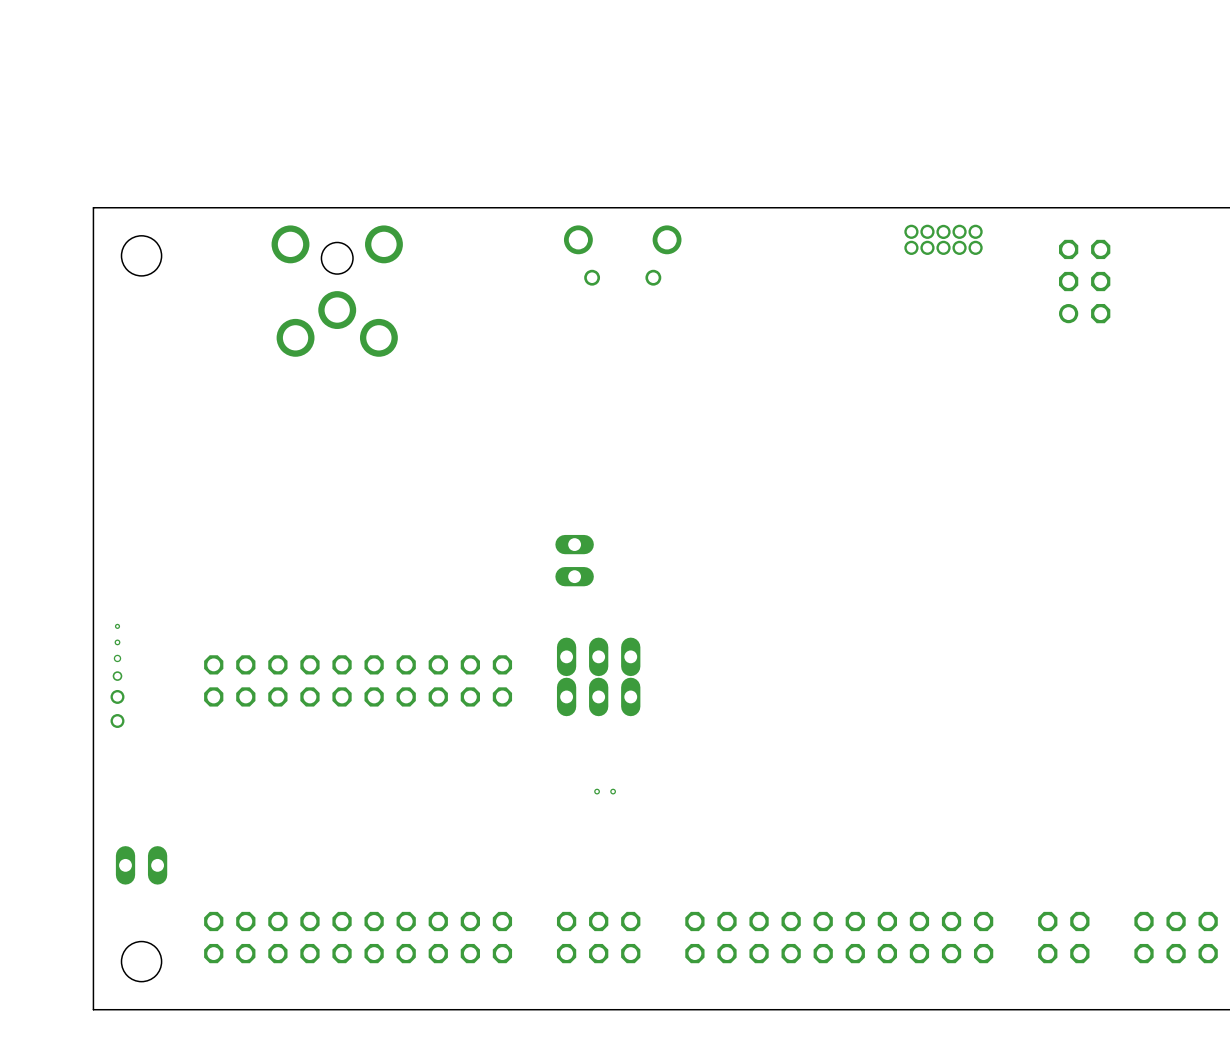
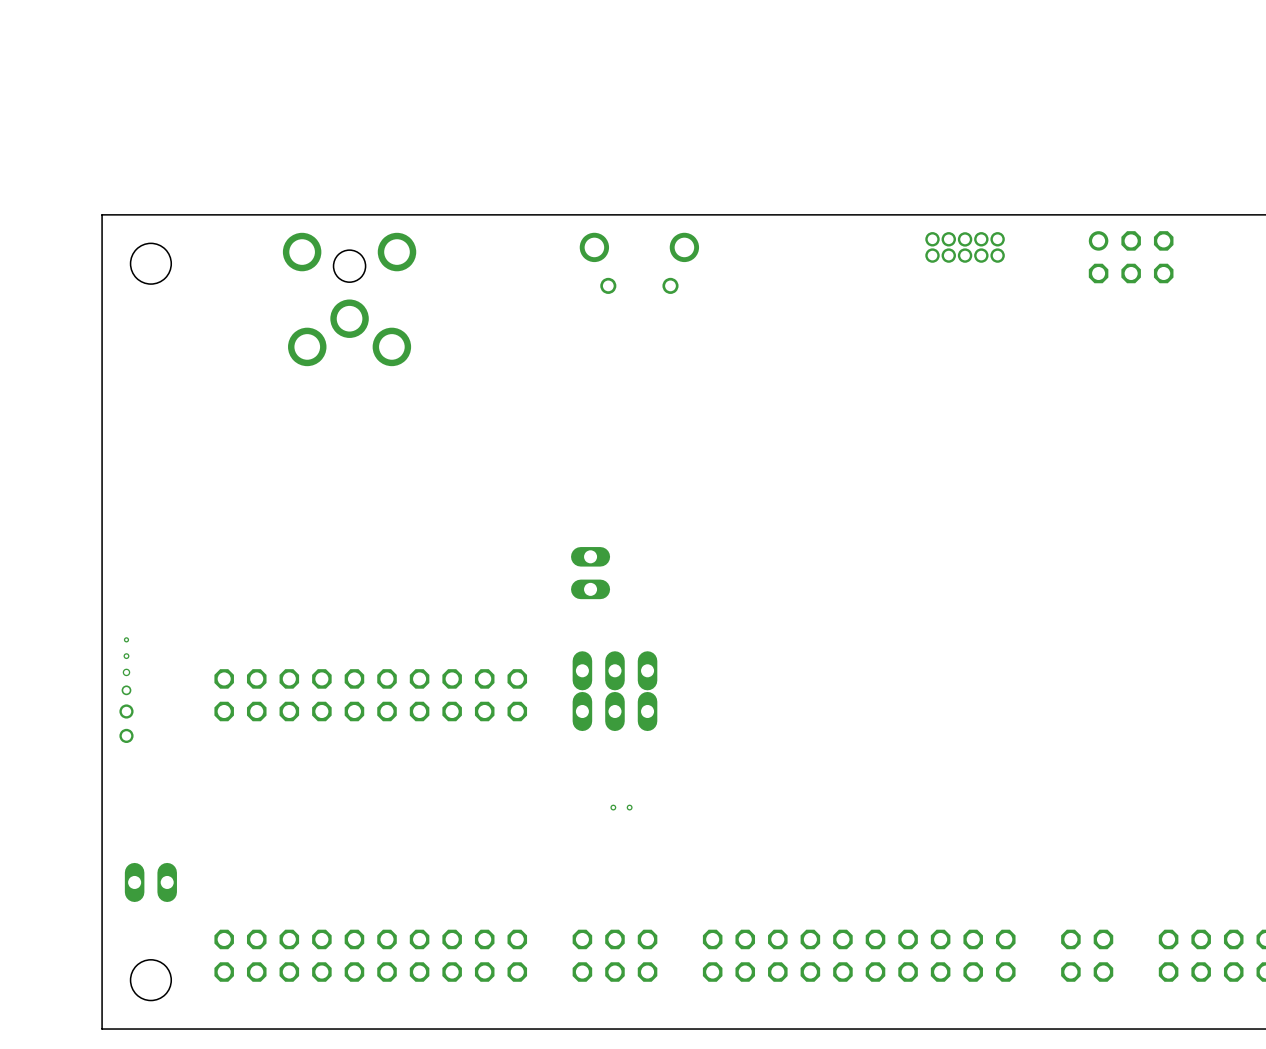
part rotation: 0° (1084, 281) -> 90° clockwise (1131, 257)

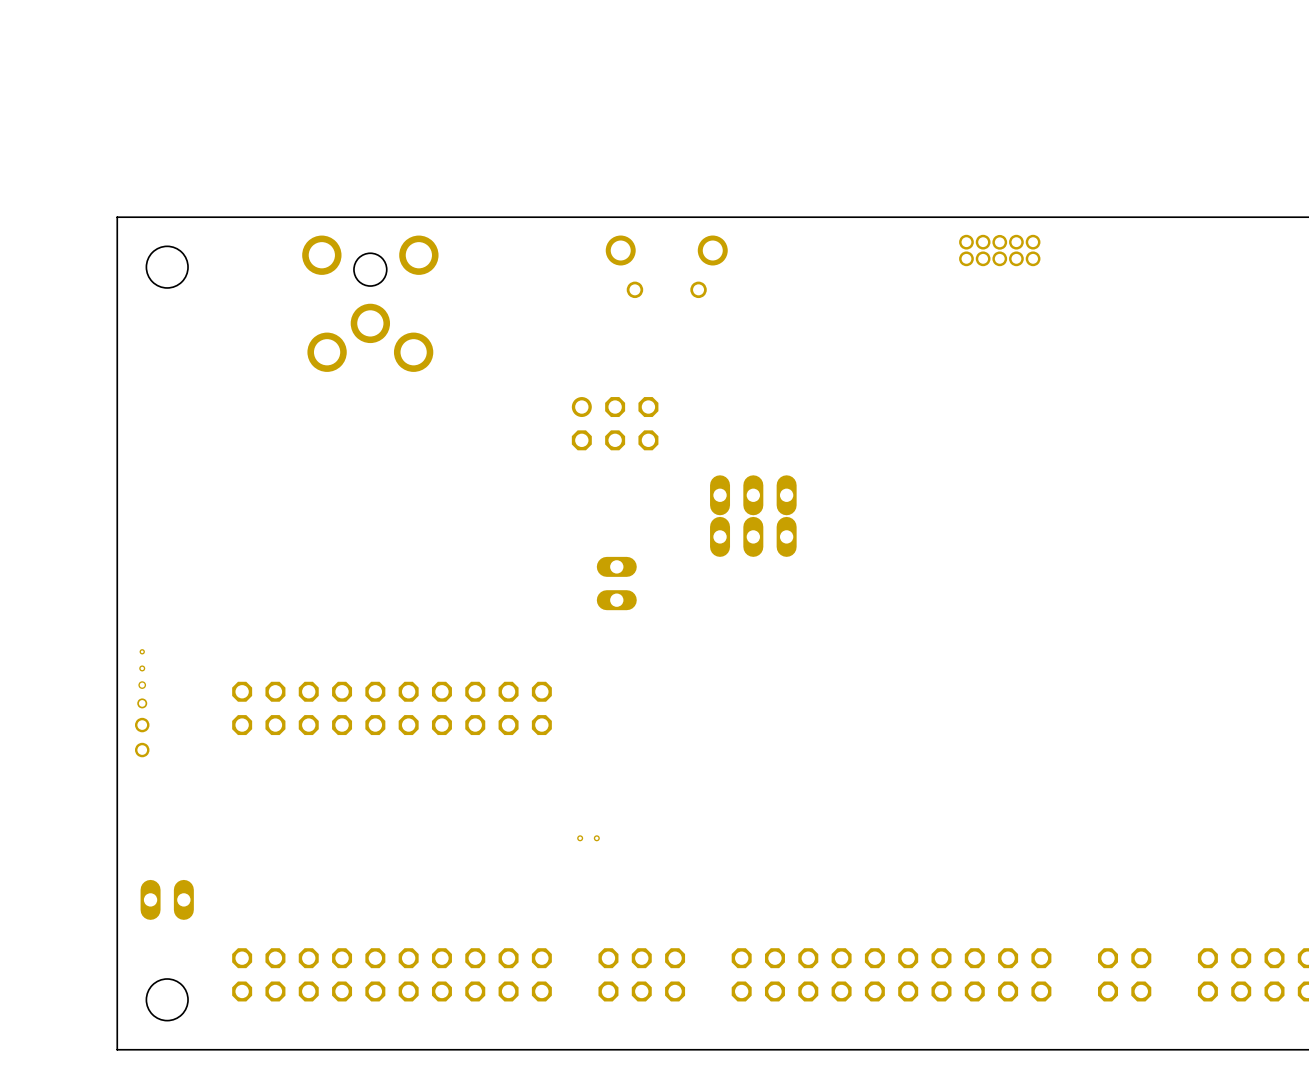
part: (1131, 257) -> none
part: none -> (615, 423)
part: none -> (753, 495)
part: none -> (753, 536)
part: (614, 670) -> none
part: (614, 711) -> none
part: (613, 807) -> none
part: (629, 807) -> none
part: none -> (580, 838)
part: none -> (596, 838)

